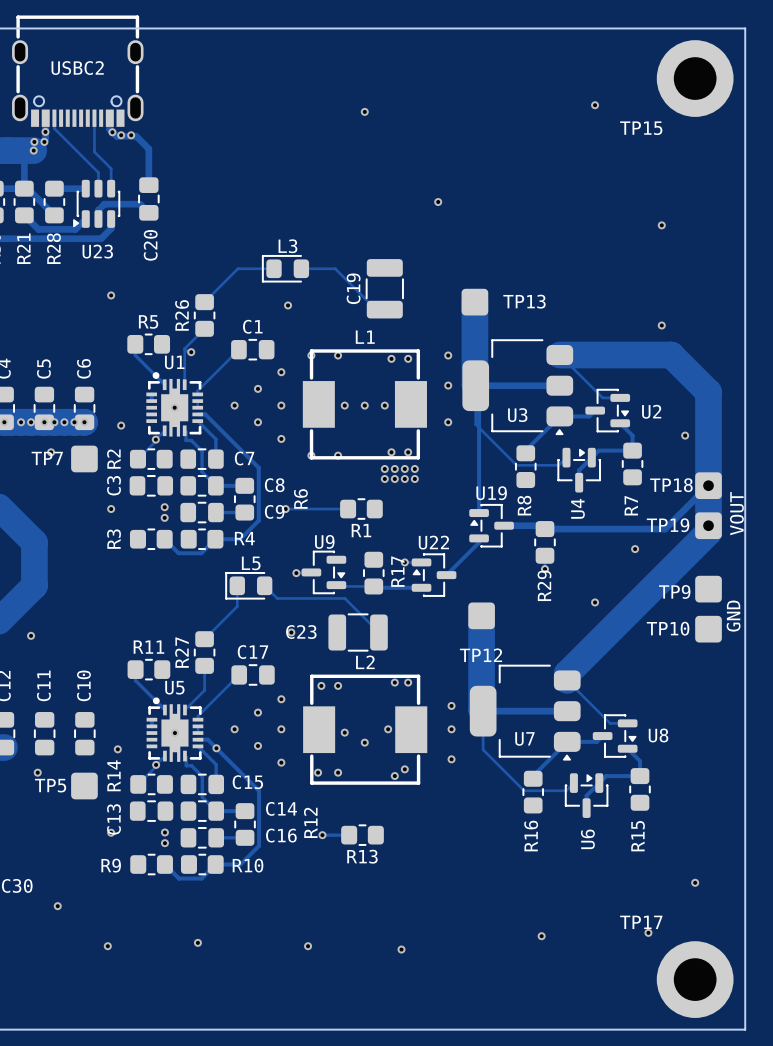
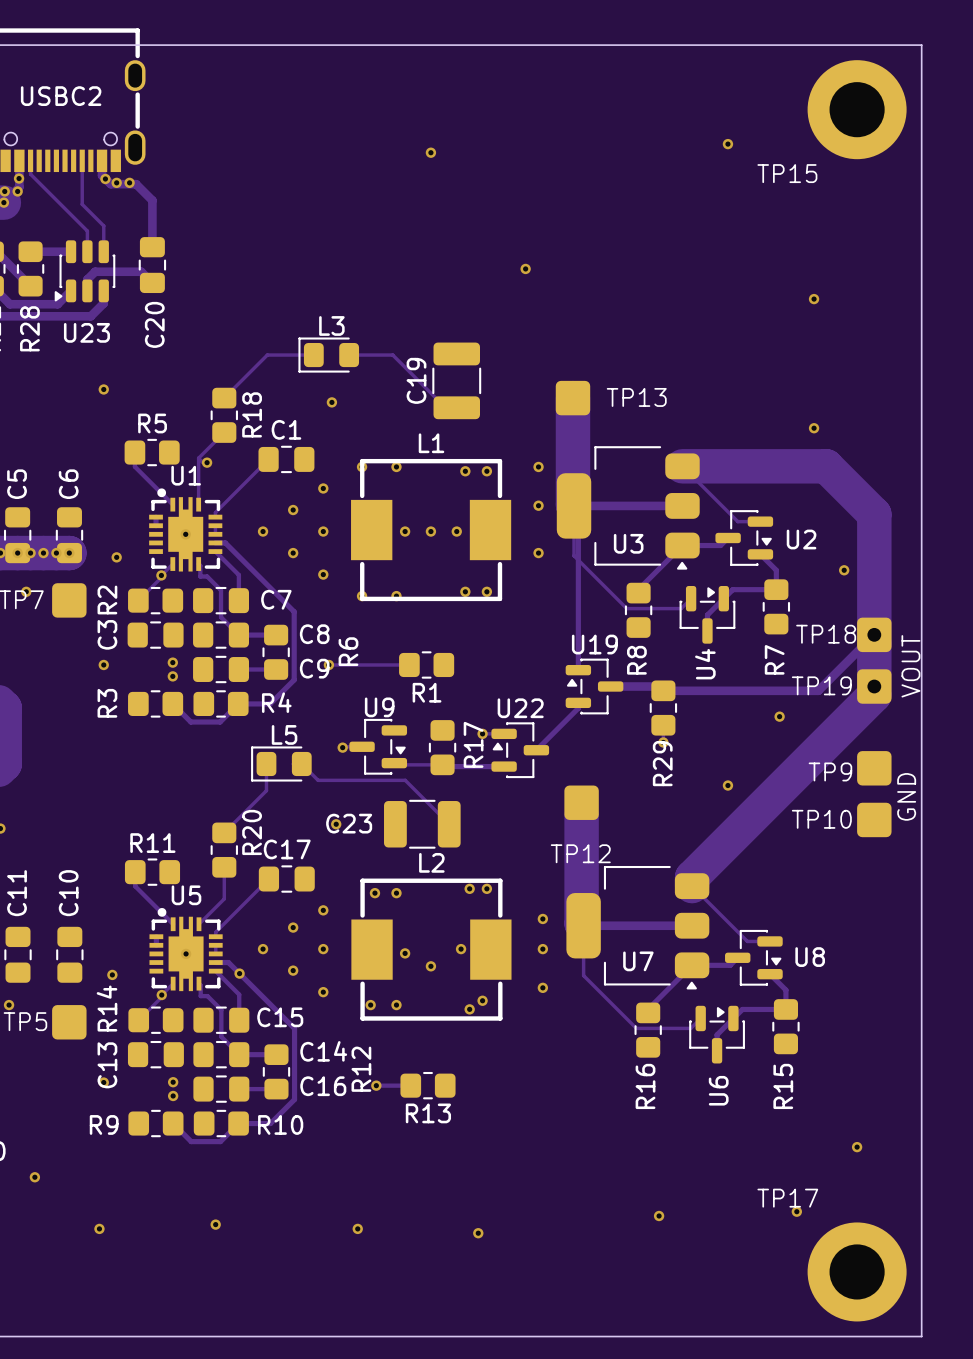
R26 name: R26 (182, 315) -> R18 (252, 414)
via: (384, 468) -> none
via: (394, 468) -> none
via: (404, 468) -> none
via: (414, 468) -> none
via: (384, 479) -> none
via: (394, 479) -> none
via: (404, 479) -> none
via: (414, 479) -> none
R27 name: R27 (181, 652) -> R20 (252, 832)

